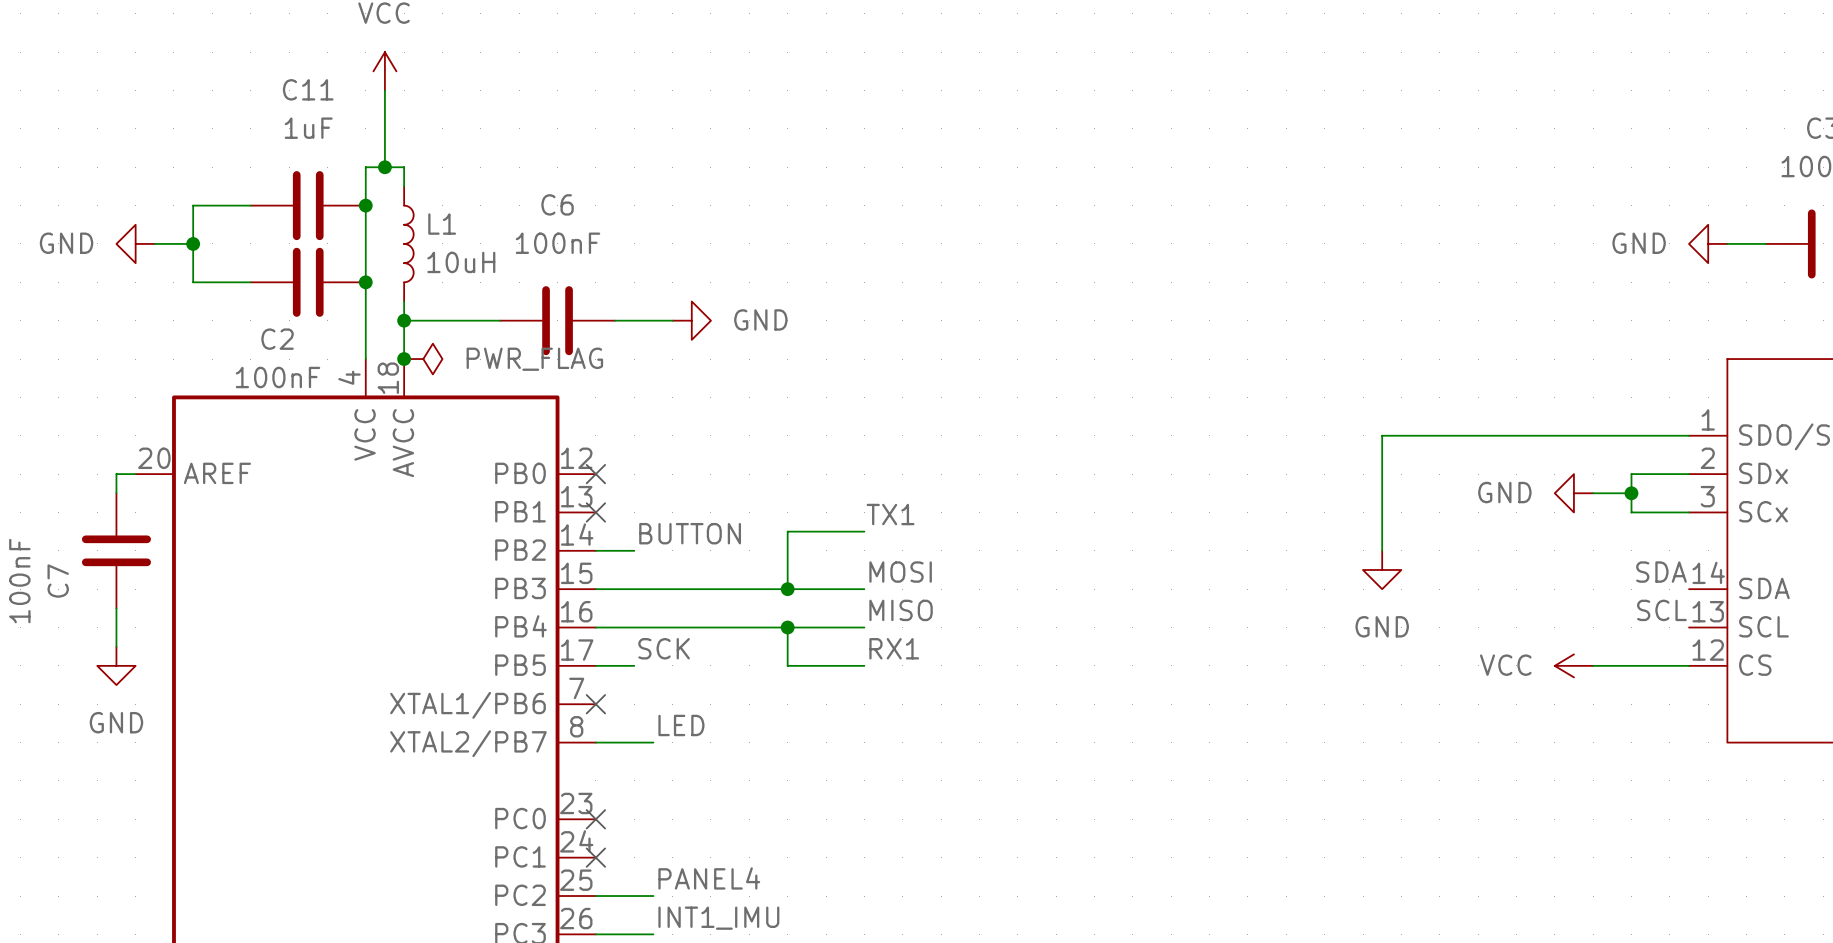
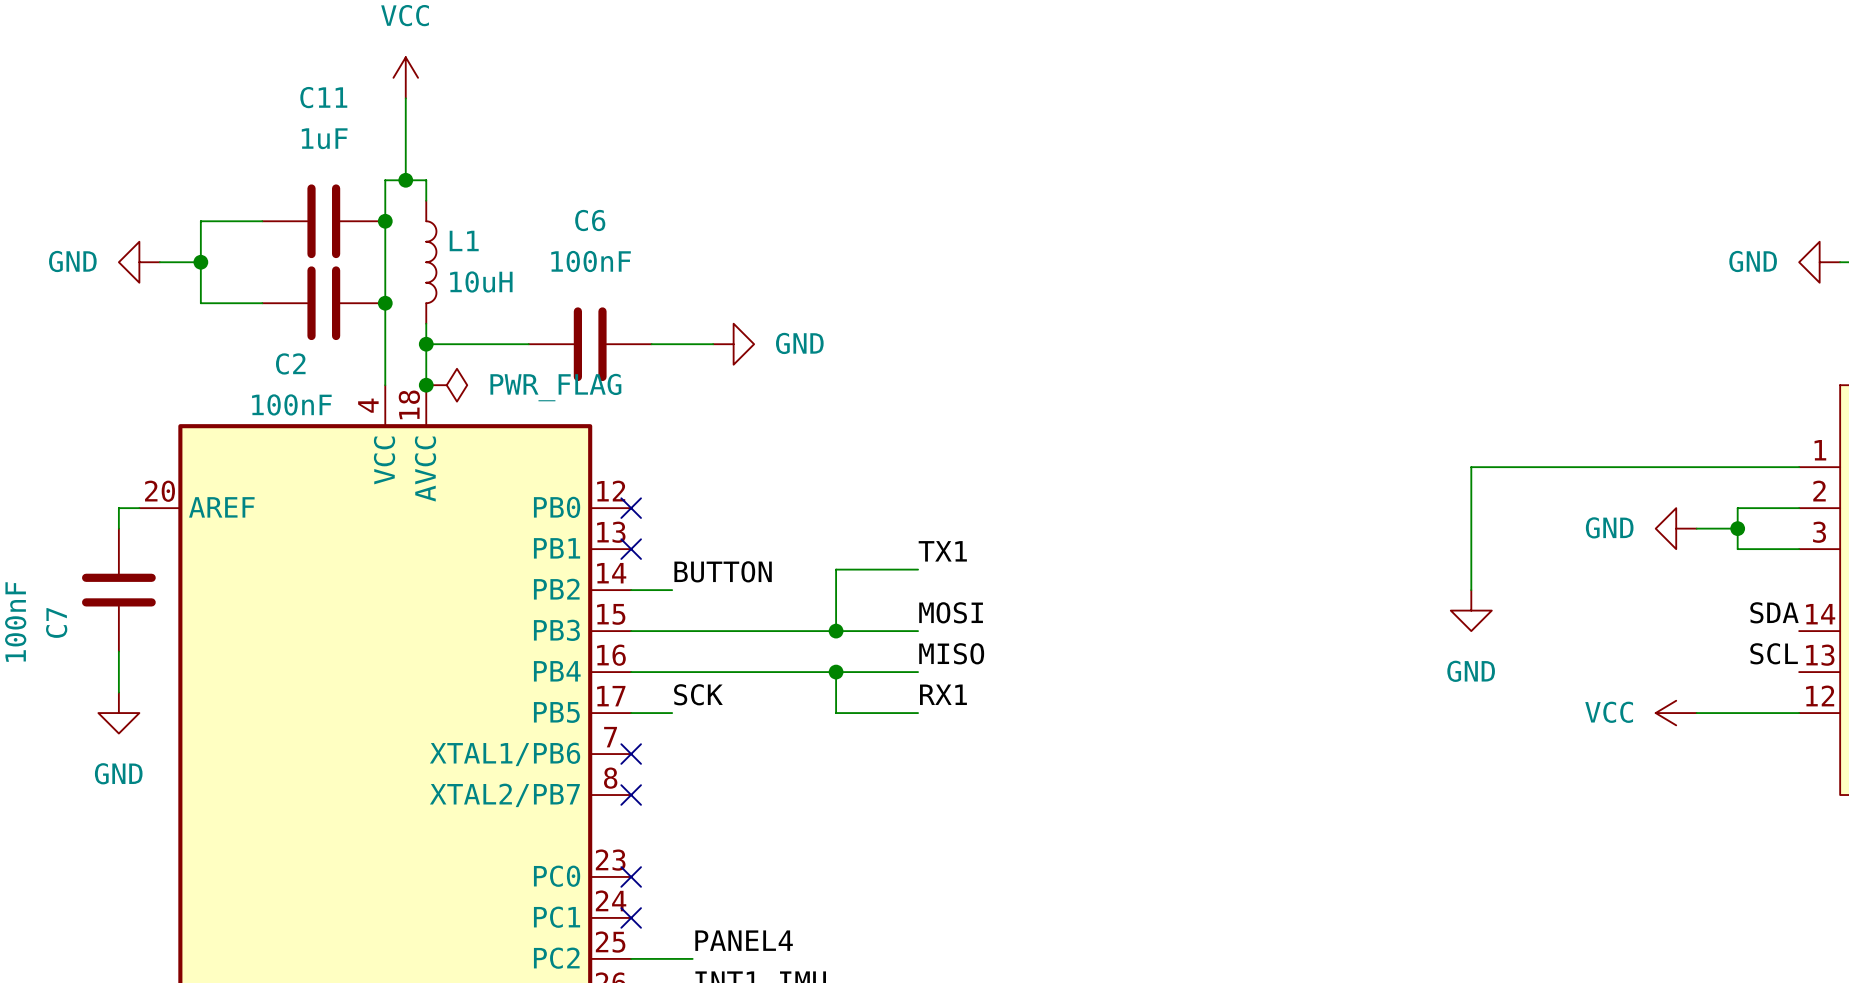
label: LED (681, 725) -> none
wire: (595, 742) (653, 742) -> none
no-connect mark: none -> (631, 795)

